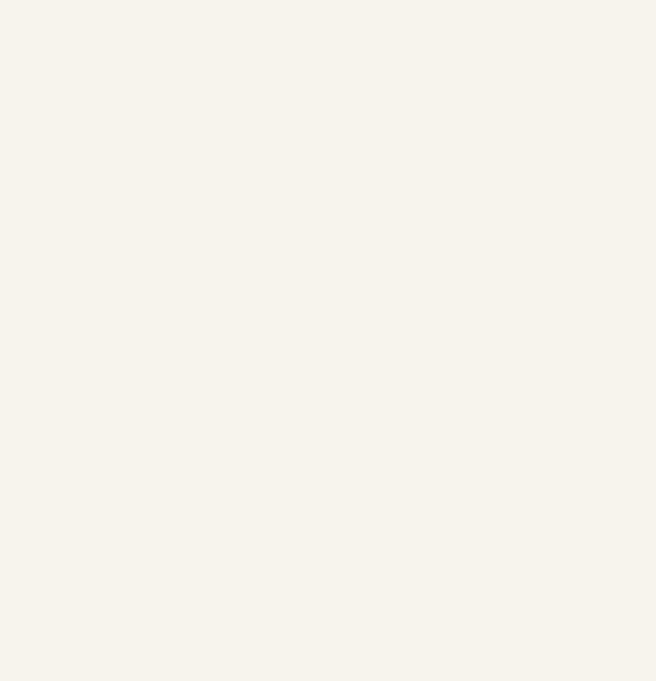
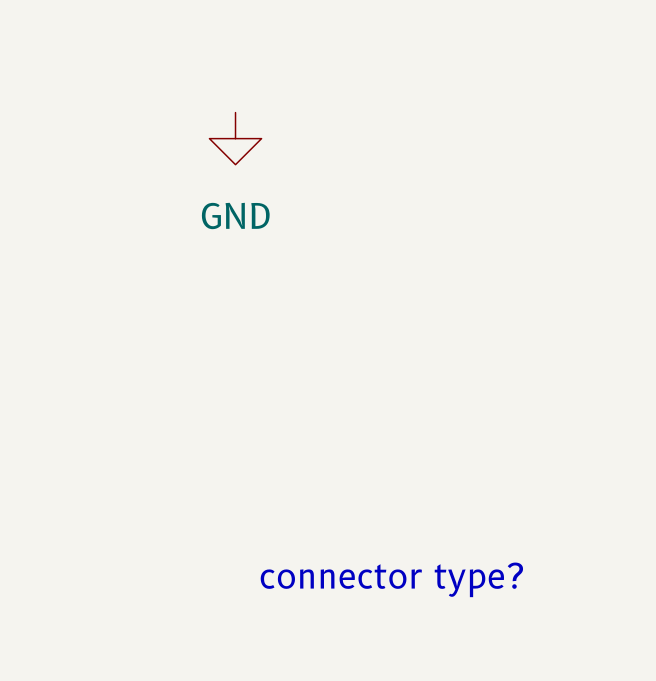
power symbol: none -> GND (235, 138)
text: none -> connector type? (391, 579)

